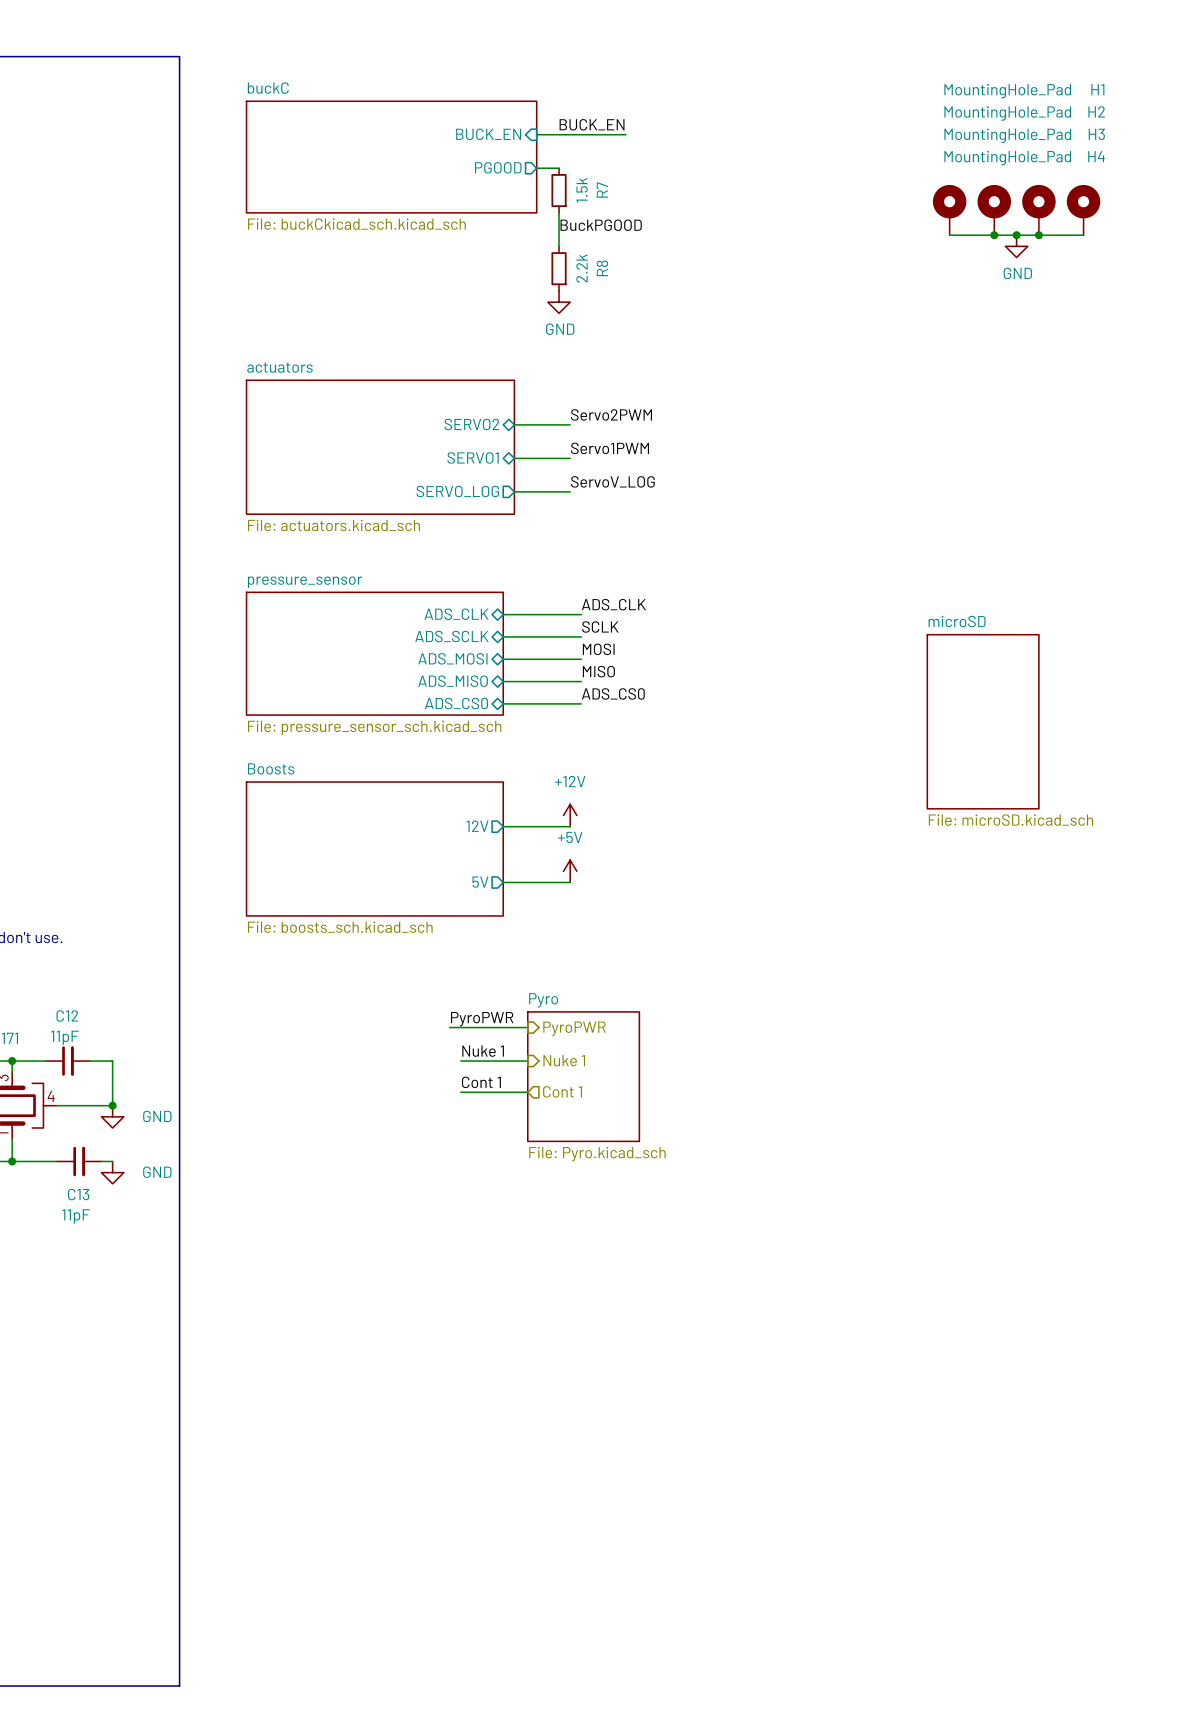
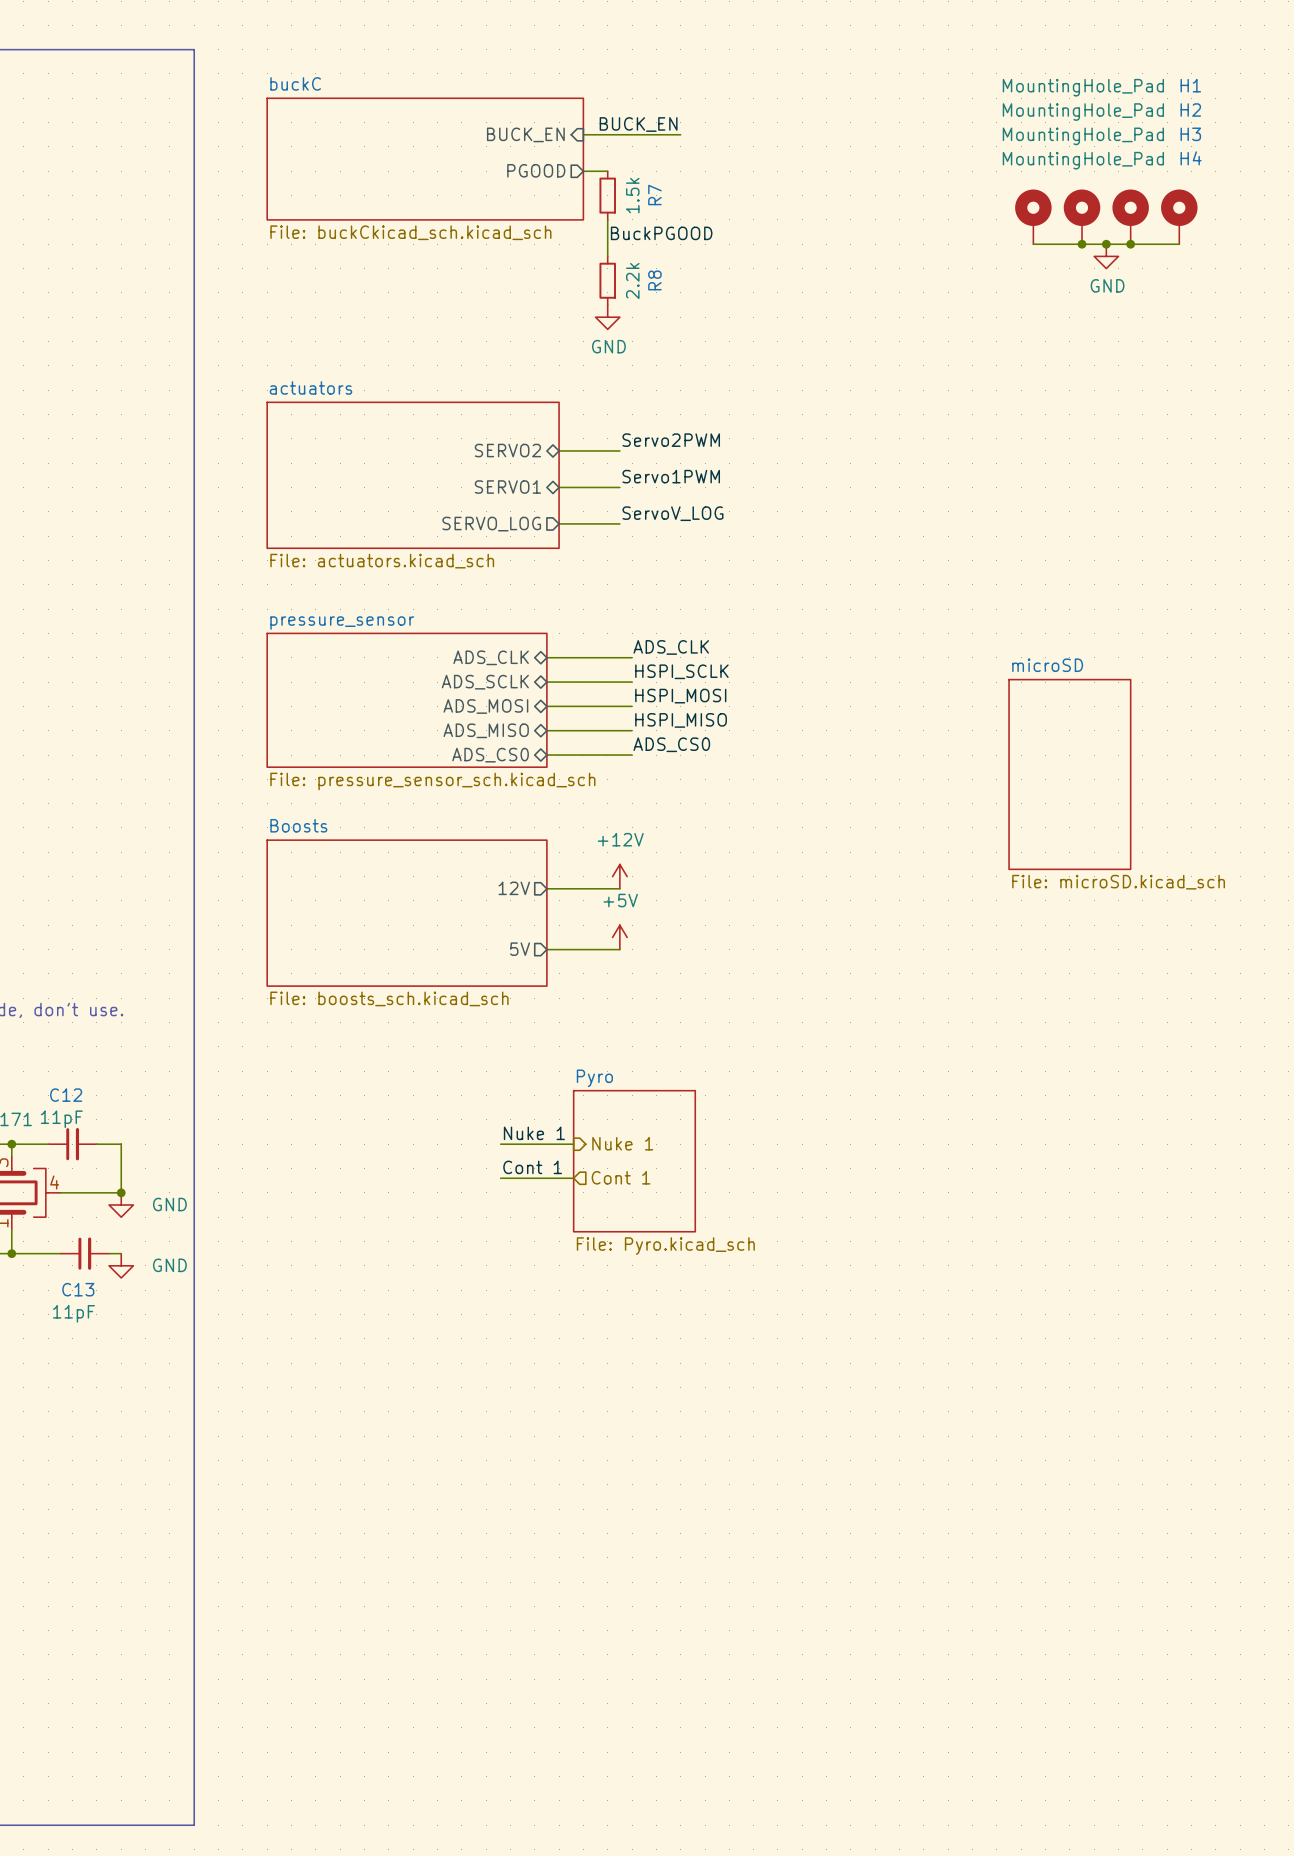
label: SCLK (600, 627) -> HSPI_SCLK (681, 671)
label: MOSI (598, 649) -> HSPI_MOSI (680, 696)
label: MISO (598, 671) -> HSPI_MISO (681, 720)
label: PyroPWR (482, 1019) -> none
wire: (449, 1027) (527, 1027) -> none
hierarchical label: PyroPWR (574, 1028) -> none

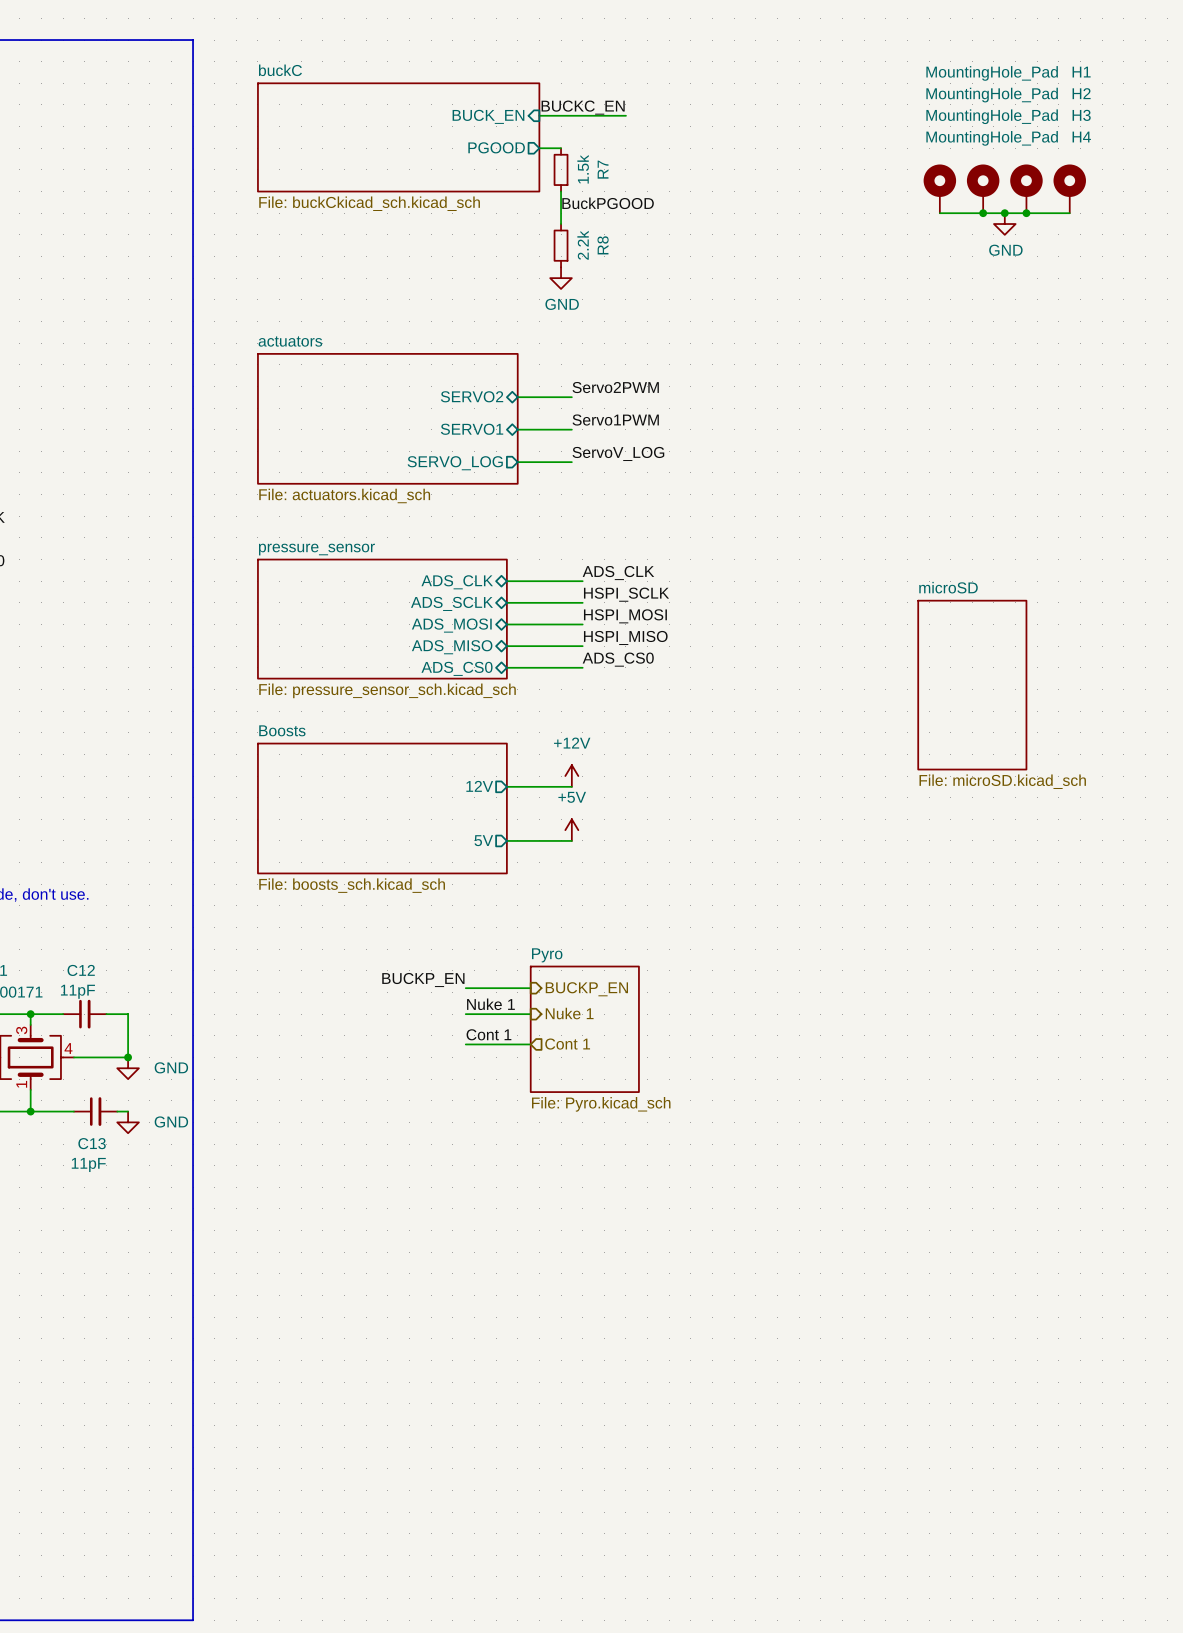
label: BUCK_EN (638, 124) -> BUCKC_EN (583, 107)
label: none -> BUCKP_EN (423, 979)
wire: none -> (465, 988) (530, 988)
hierarchical label: none -> BUCKP_EN (586, 989)

